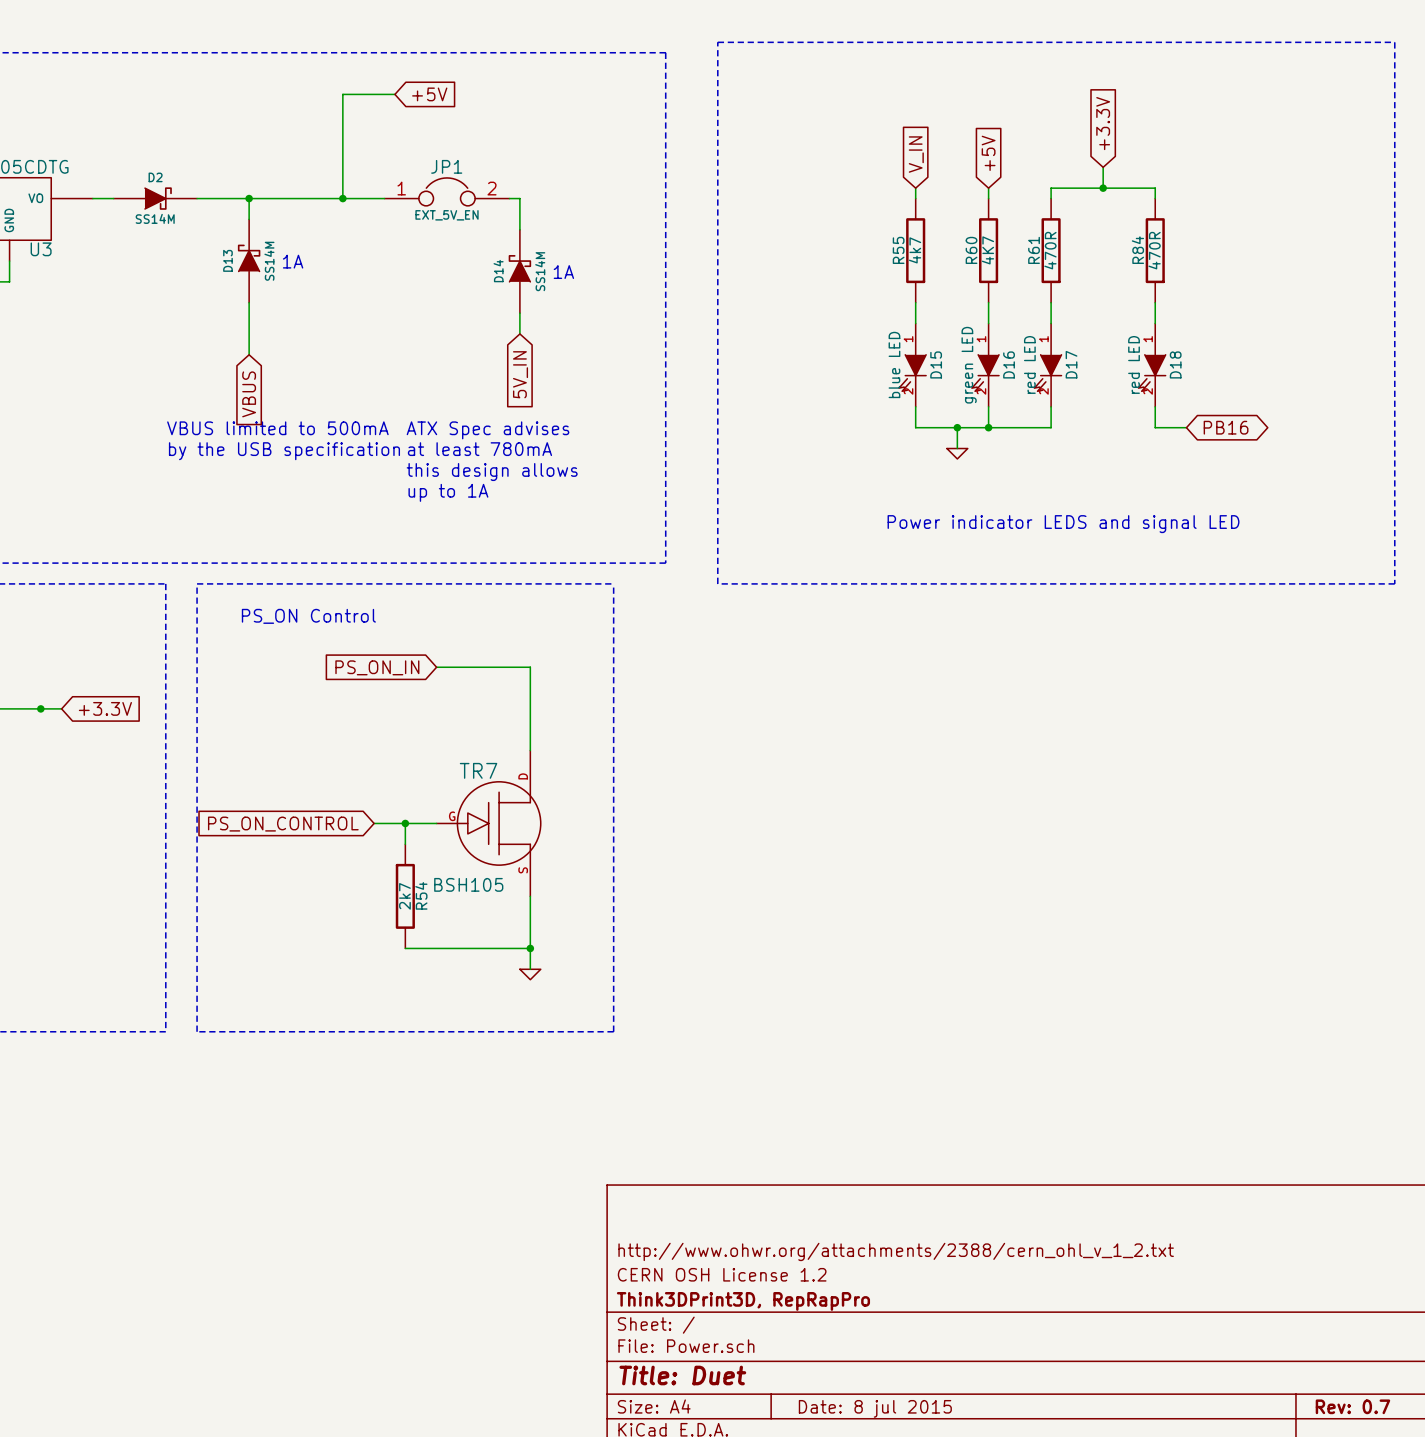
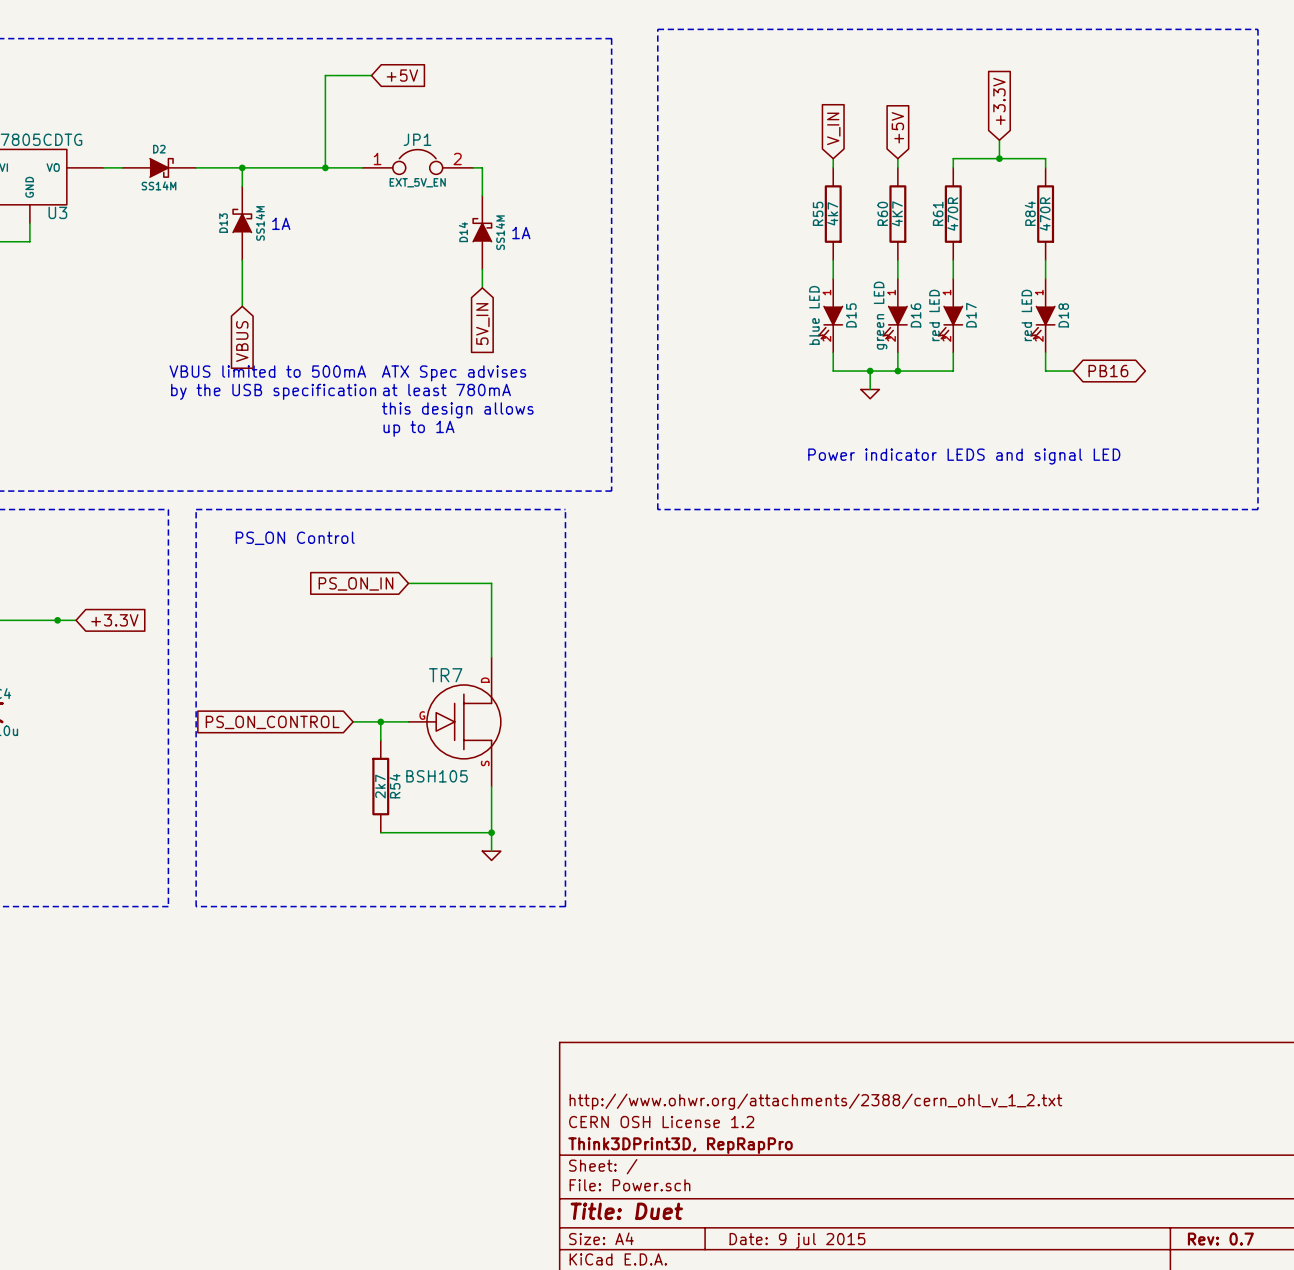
title block: Date: 8 jul 2015 (875, 1408) -> Date: 9 jul 2015 (797, 1240)

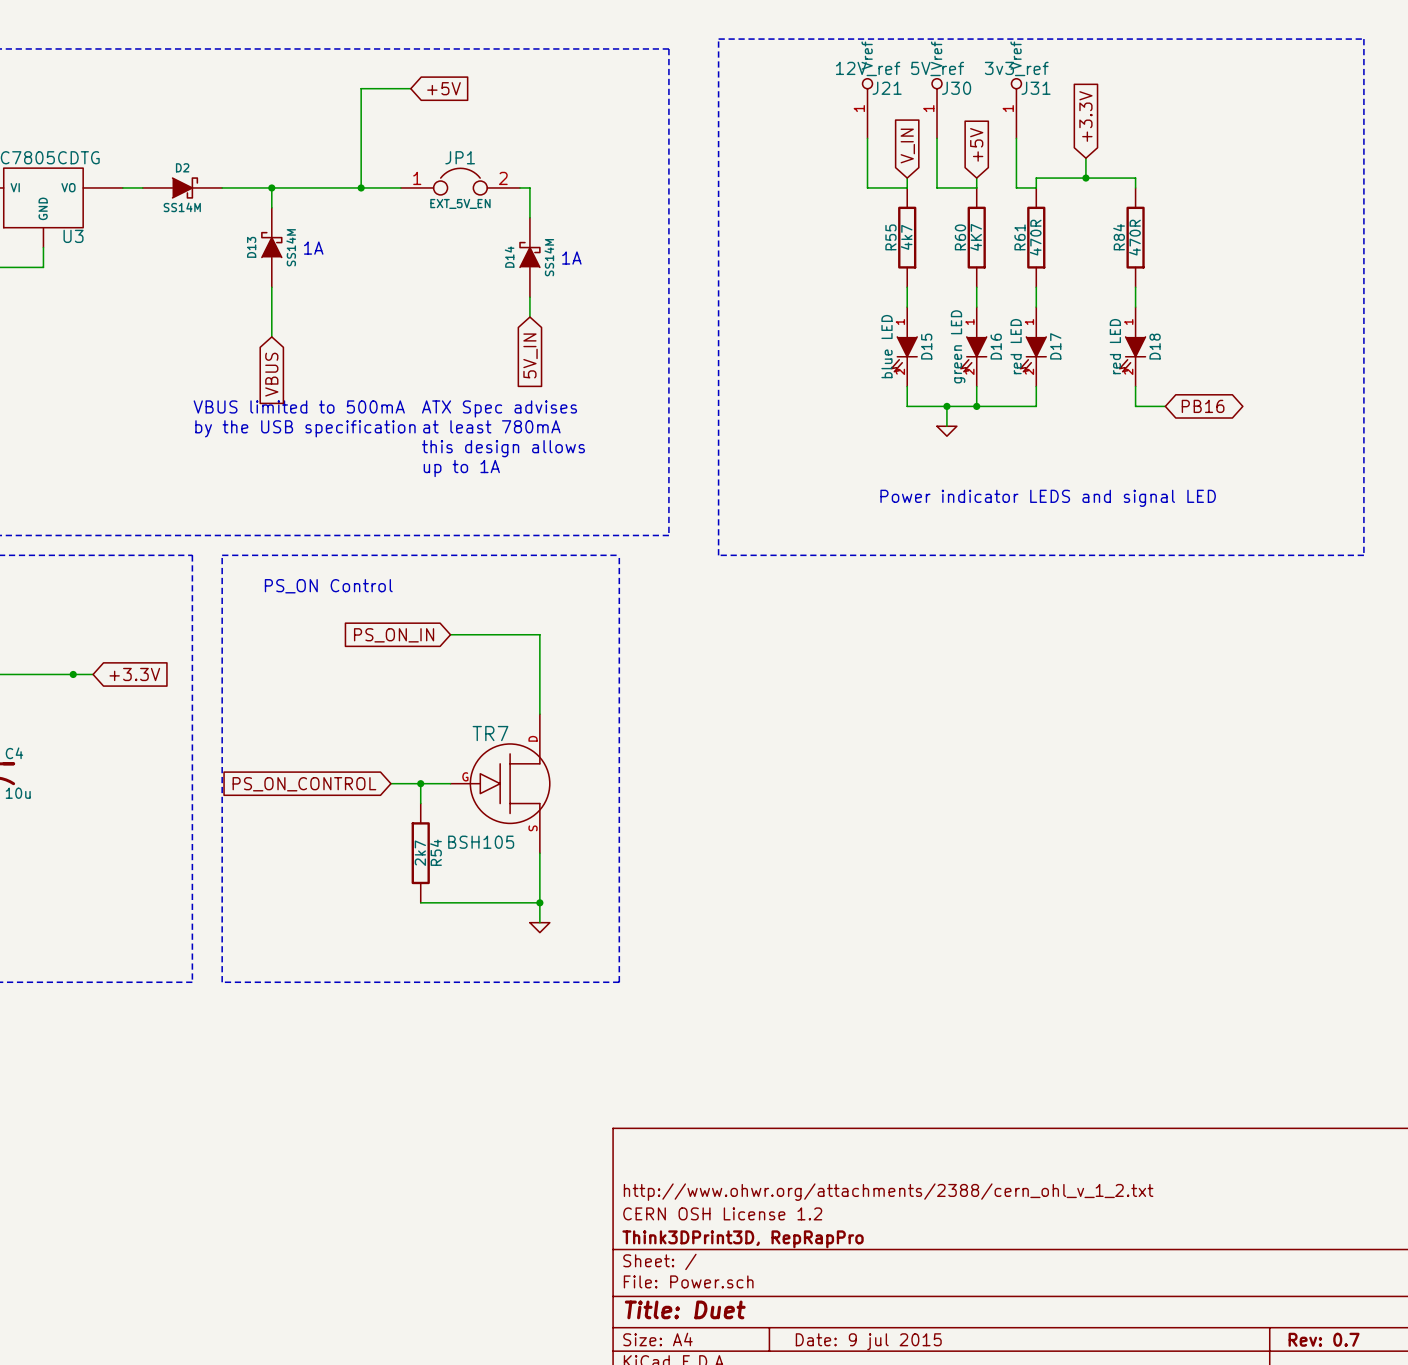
J21: none -> 12V_ref (867, 108)
J30: none -> 5V_ref (937, 108)
J31: none -> 3v3_ref (1016, 108)
wire: none -> (867, 138) (867, 187) (907, 187)
wire: none -> (937, 138) (937, 187) (976, 187)
wire: none -> (1016, 138) (1016, 187) (1036, 187)

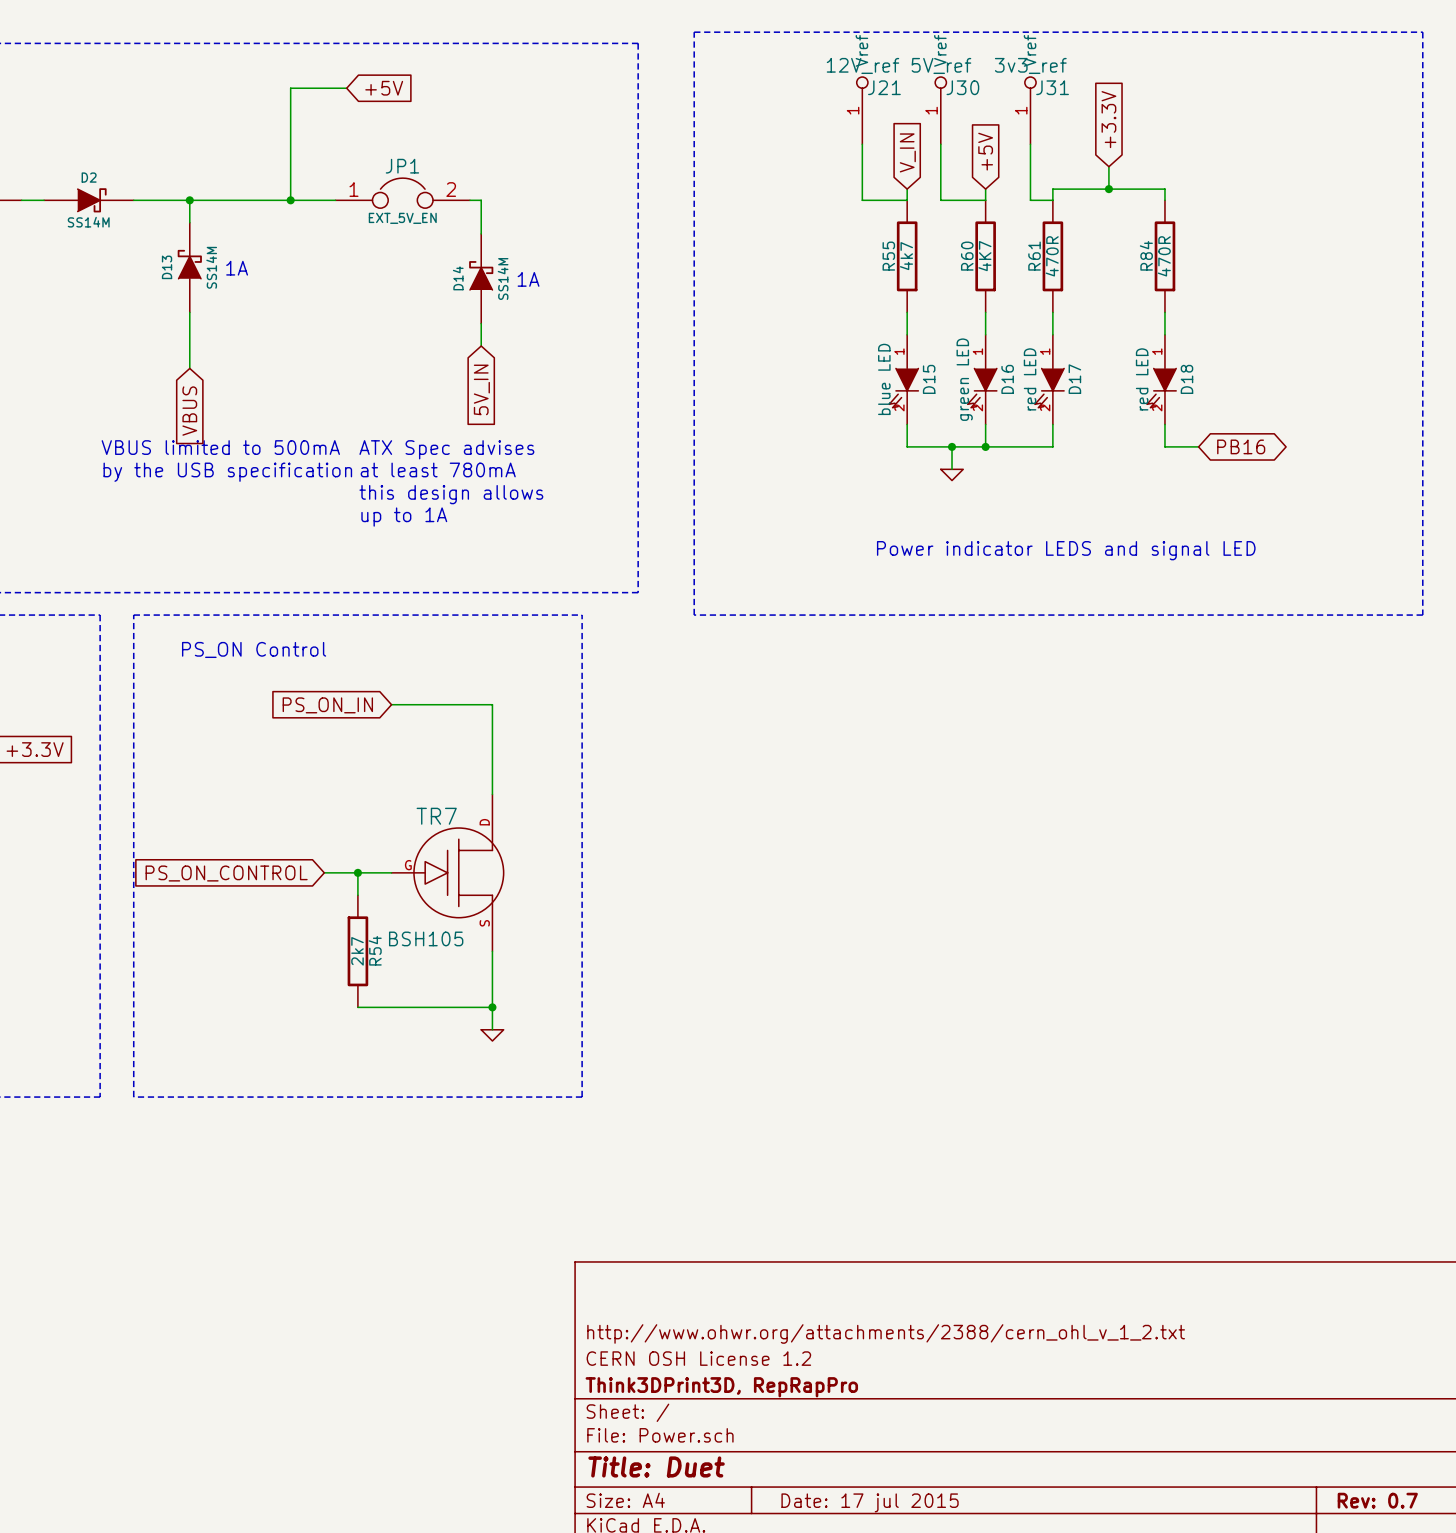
title block: Date: 9 jul 2015 (868, 1341) -> Date: 17 jul 2015 (870, 1502)

